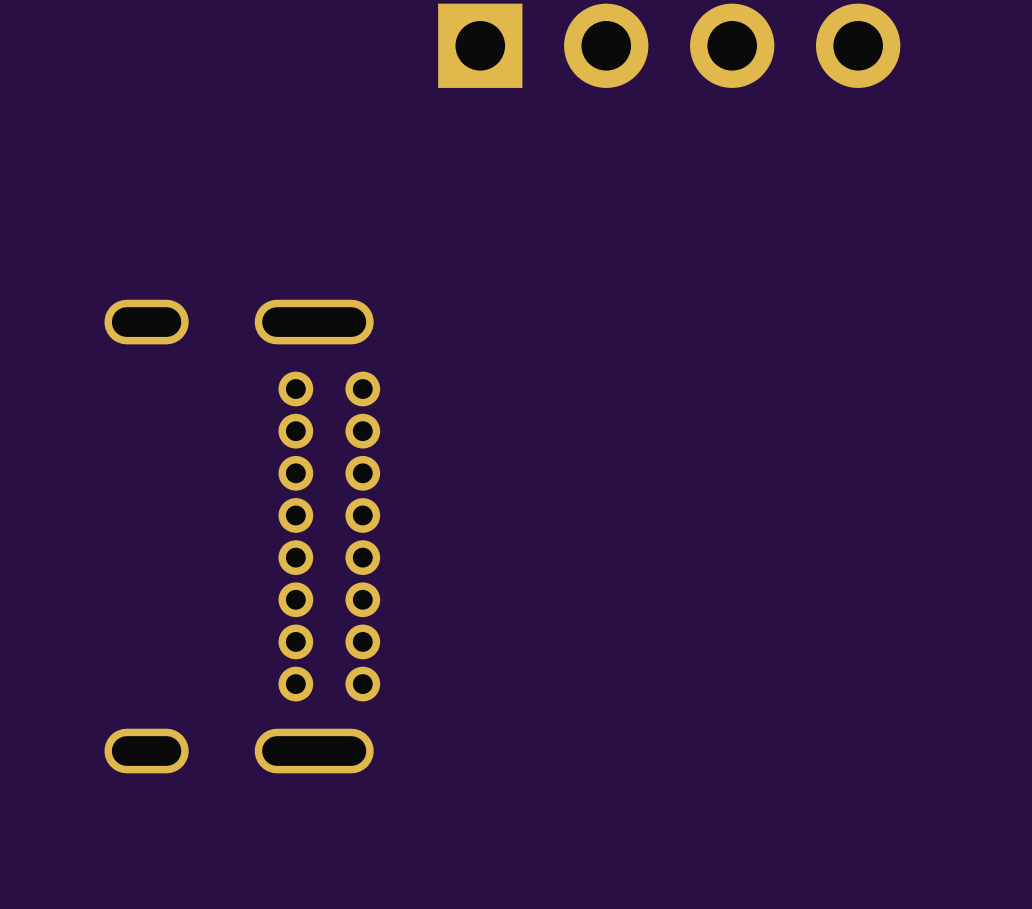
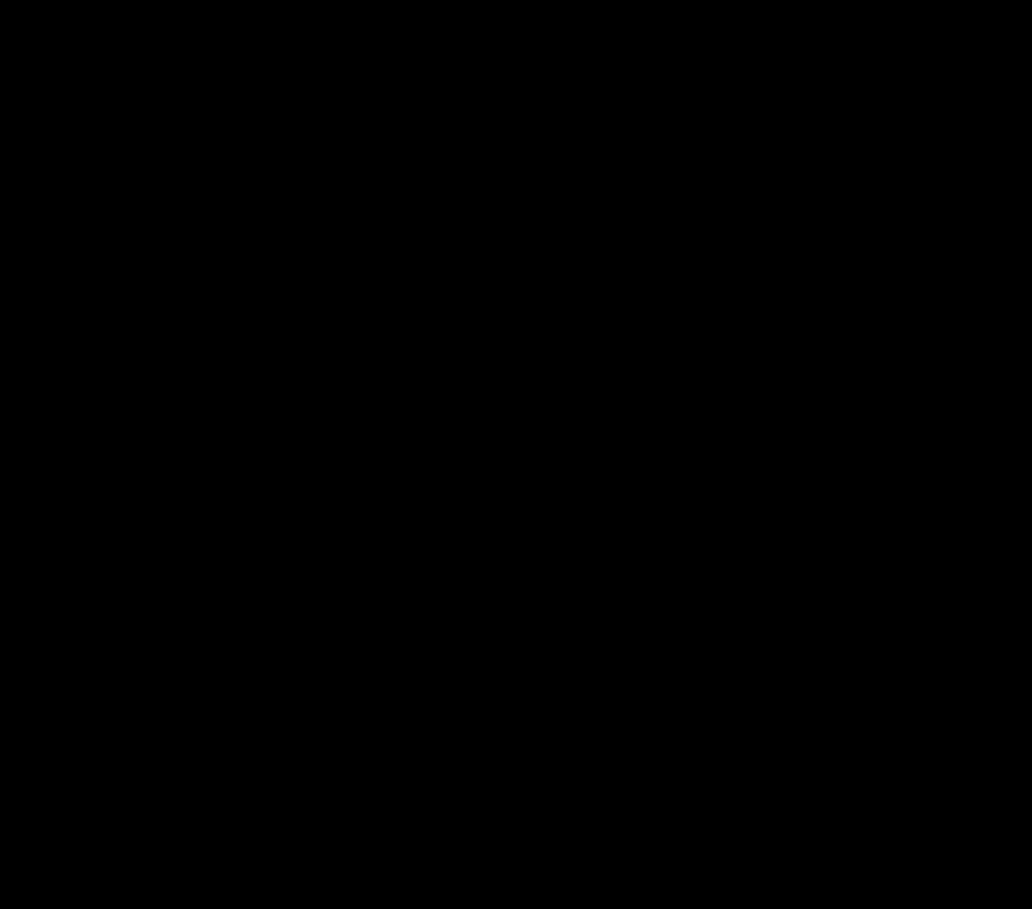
part: (669, 45) -> none
part: (242, 536) -> none

